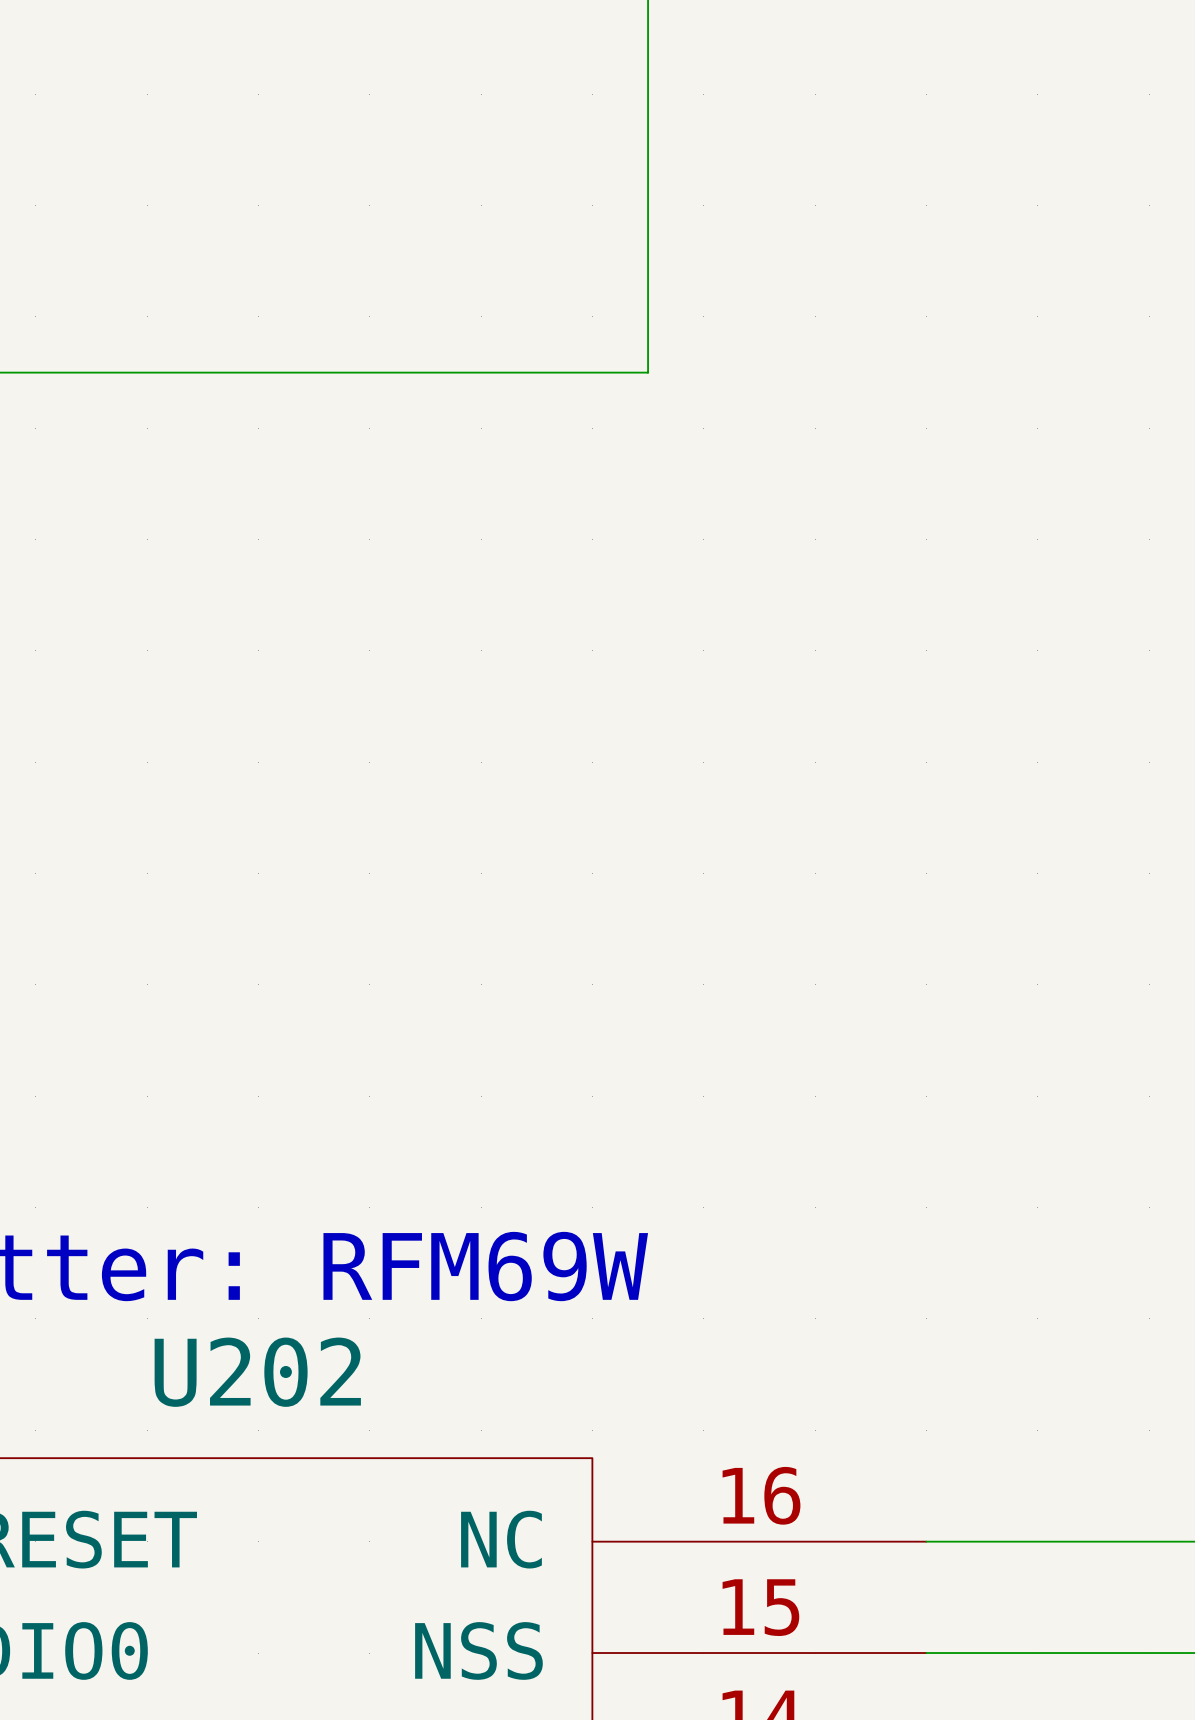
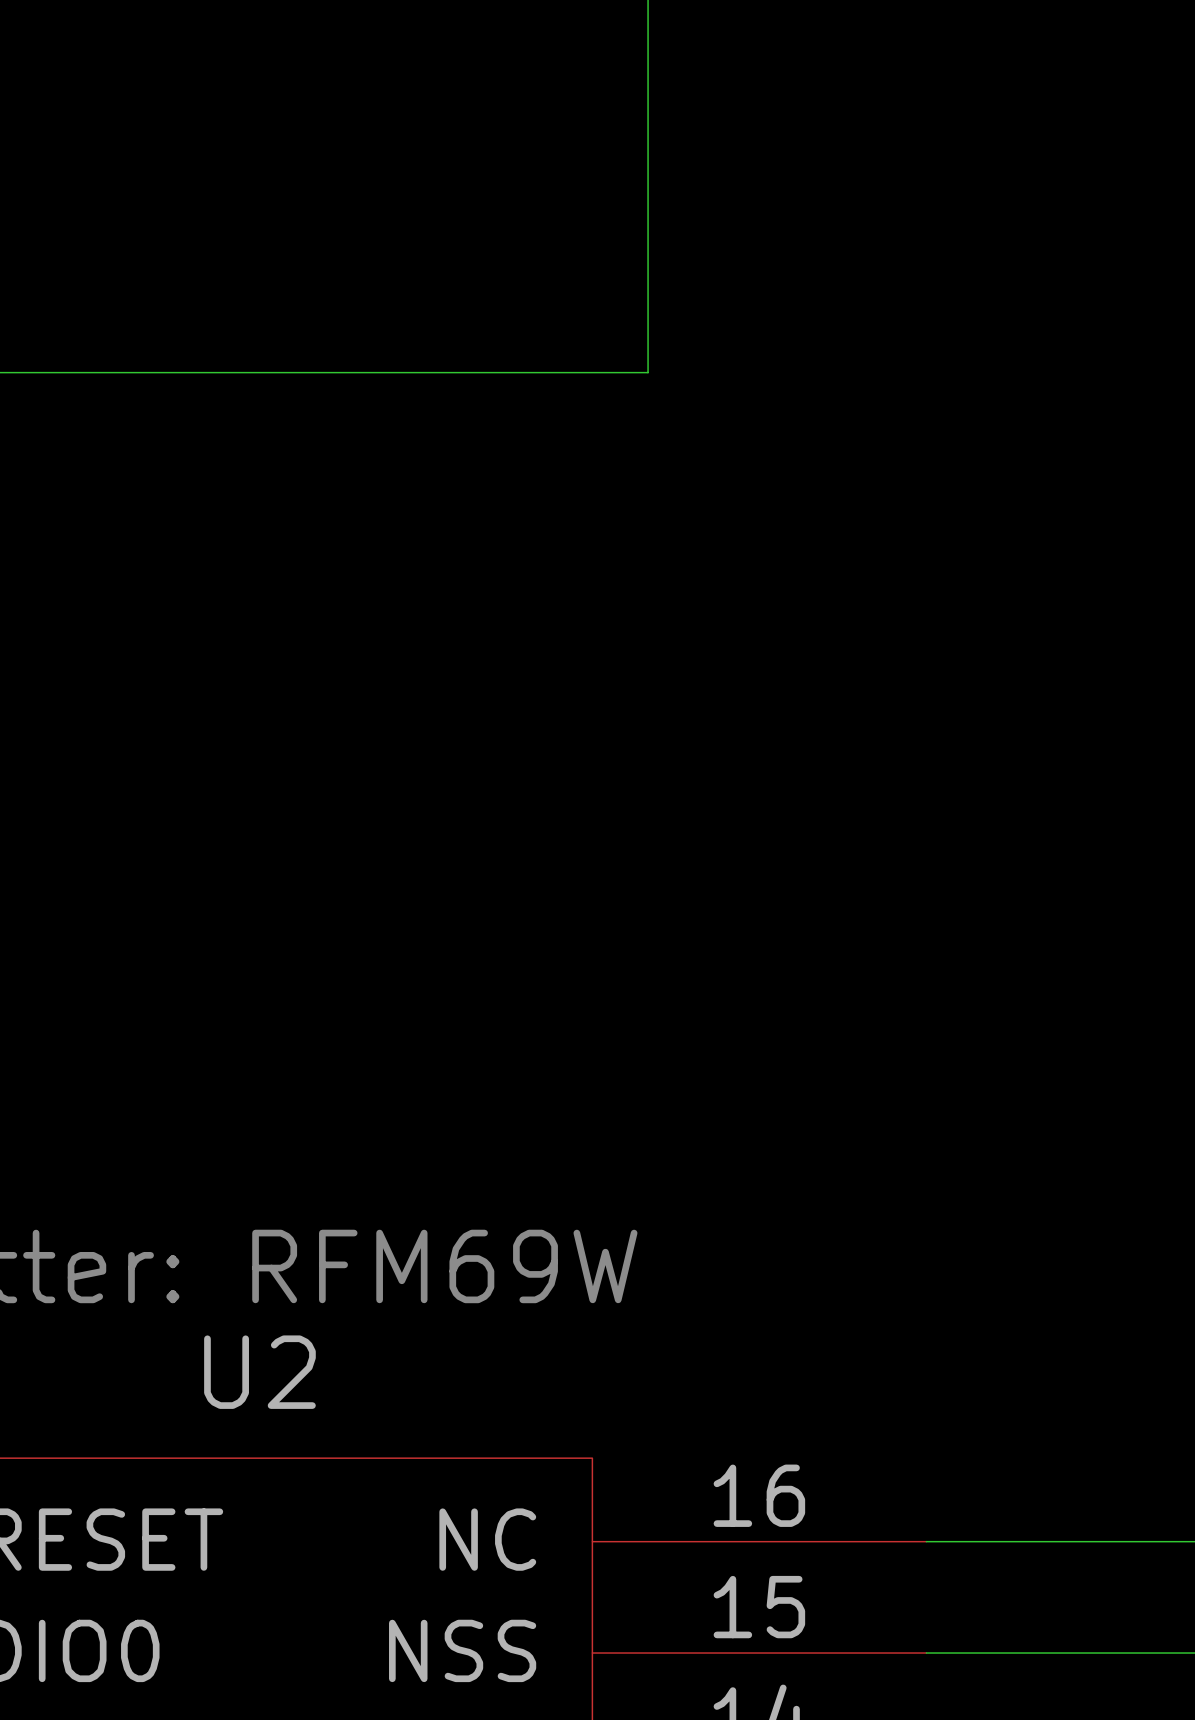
U202 name: U202 (257, 1372) -> U2 (259, 1372)

